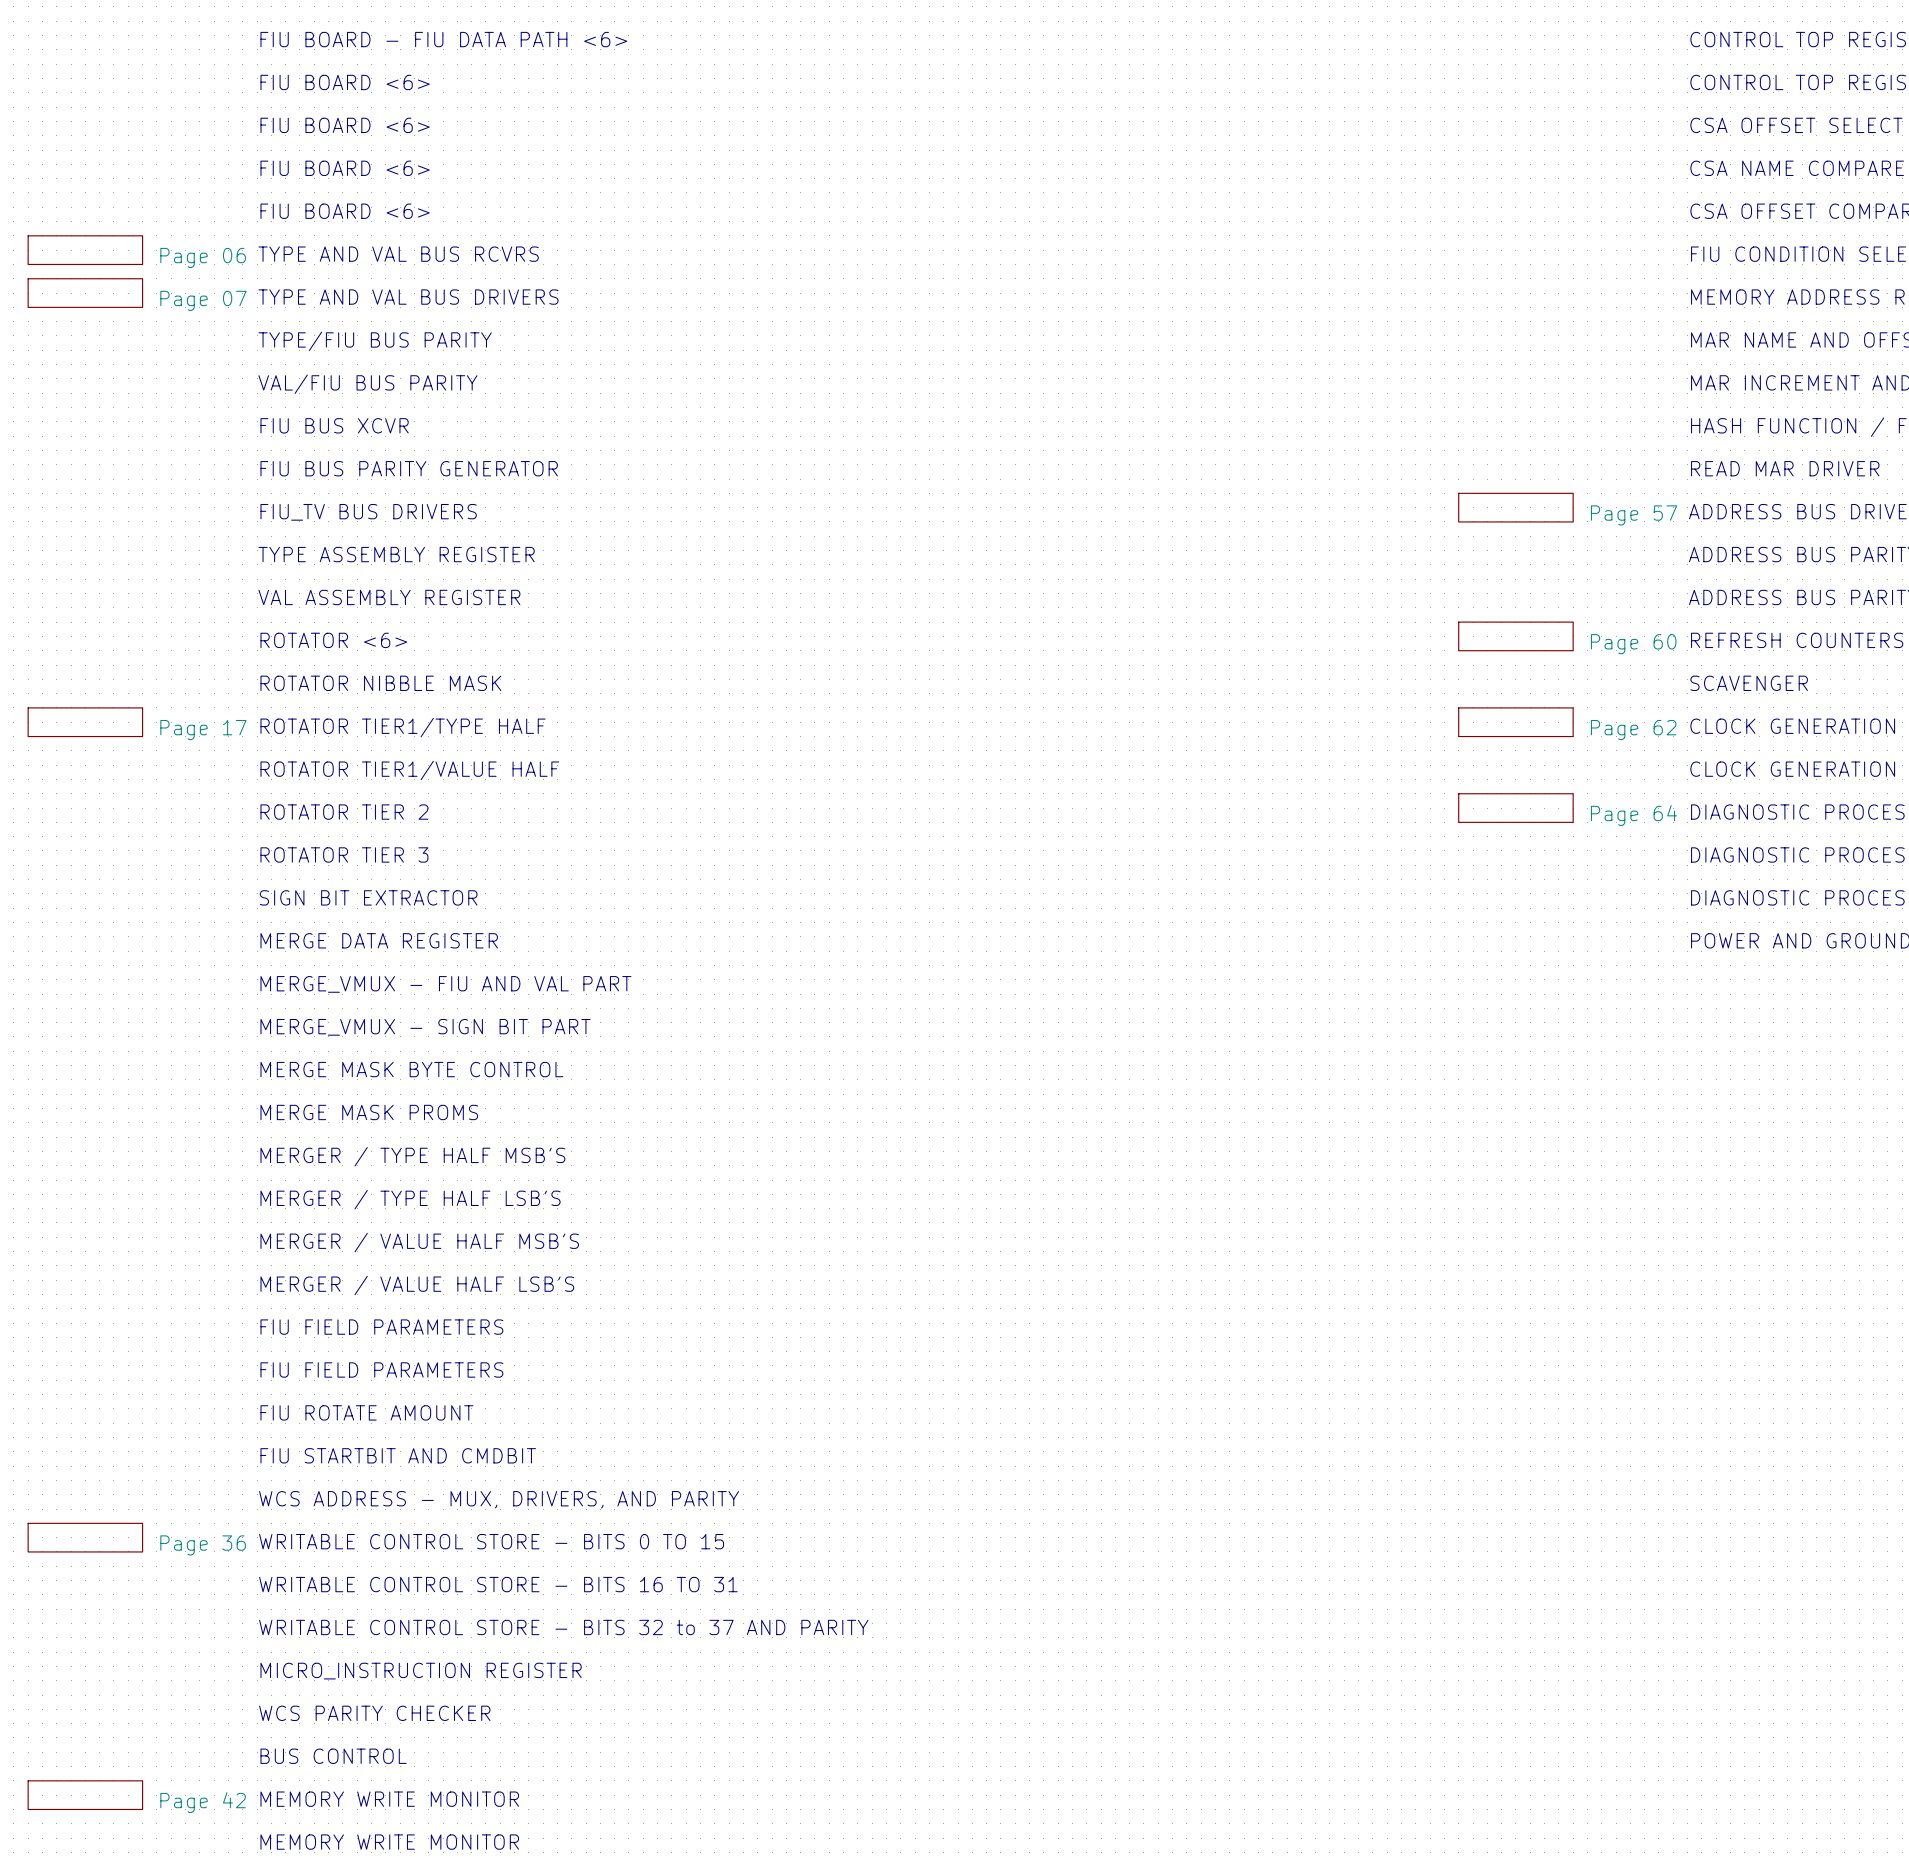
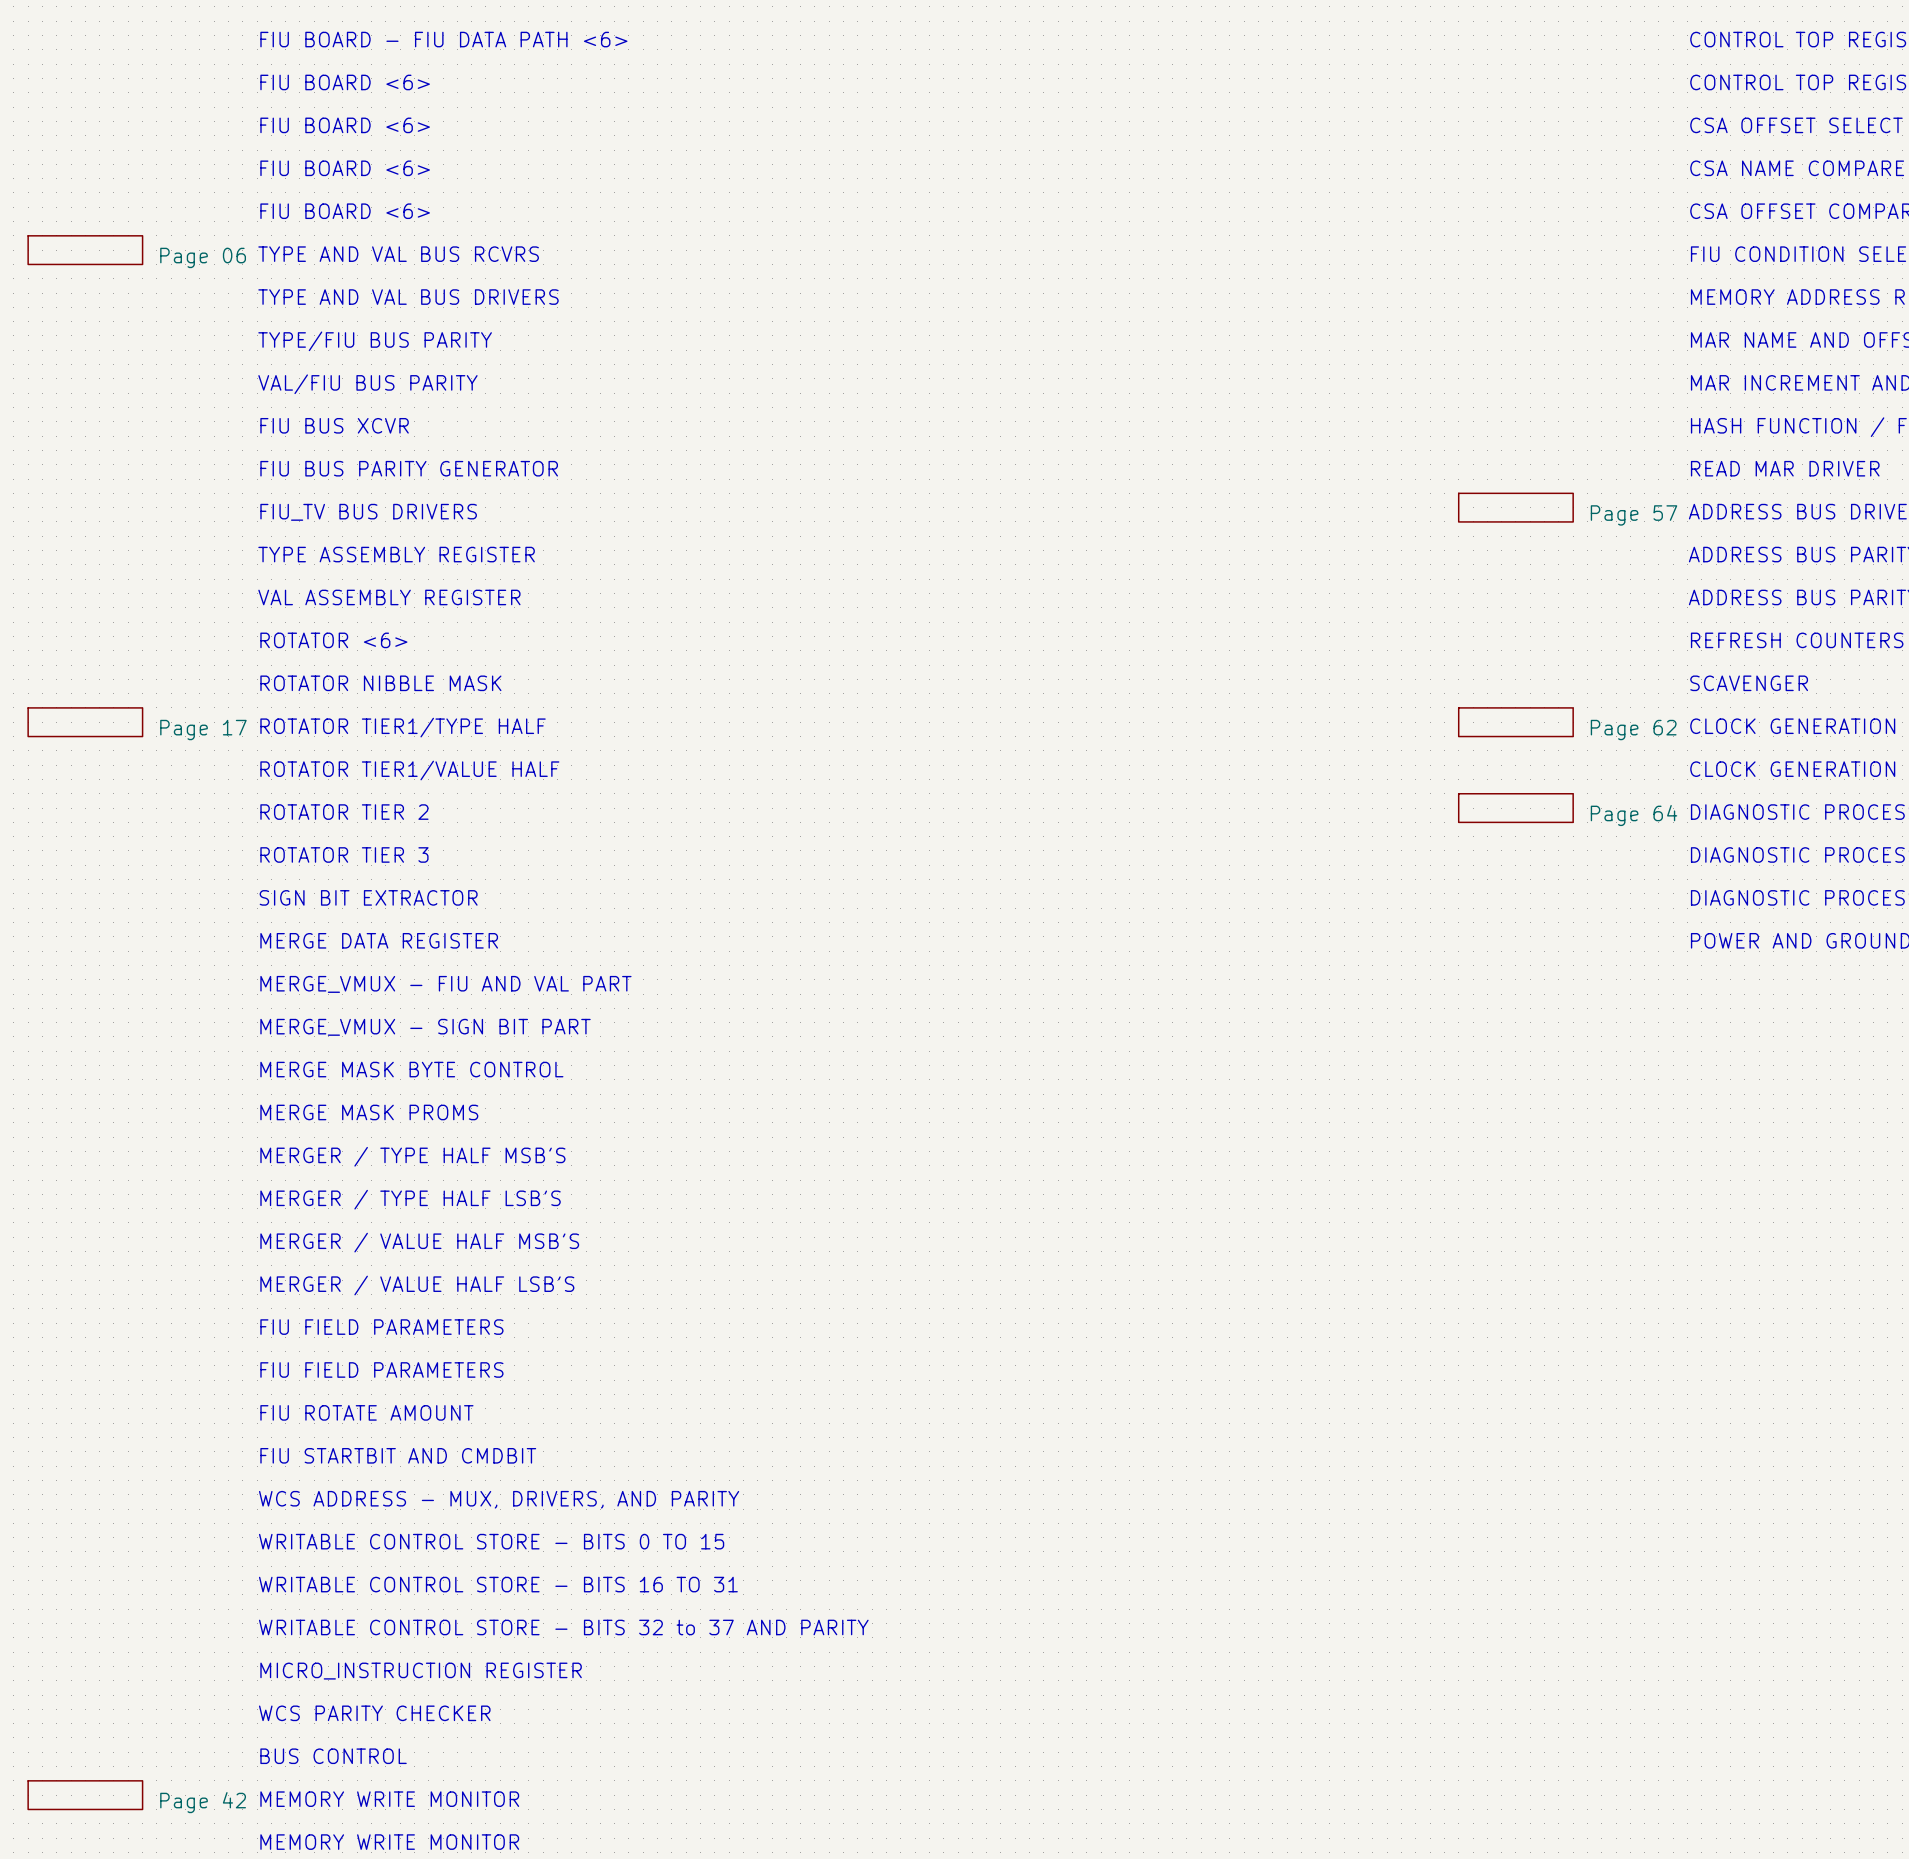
sheet Page 07: (85, 293) -> none
sheet Page 60: (1515, 636) -> none
sheet Page 36: (85, 1537) -> none

